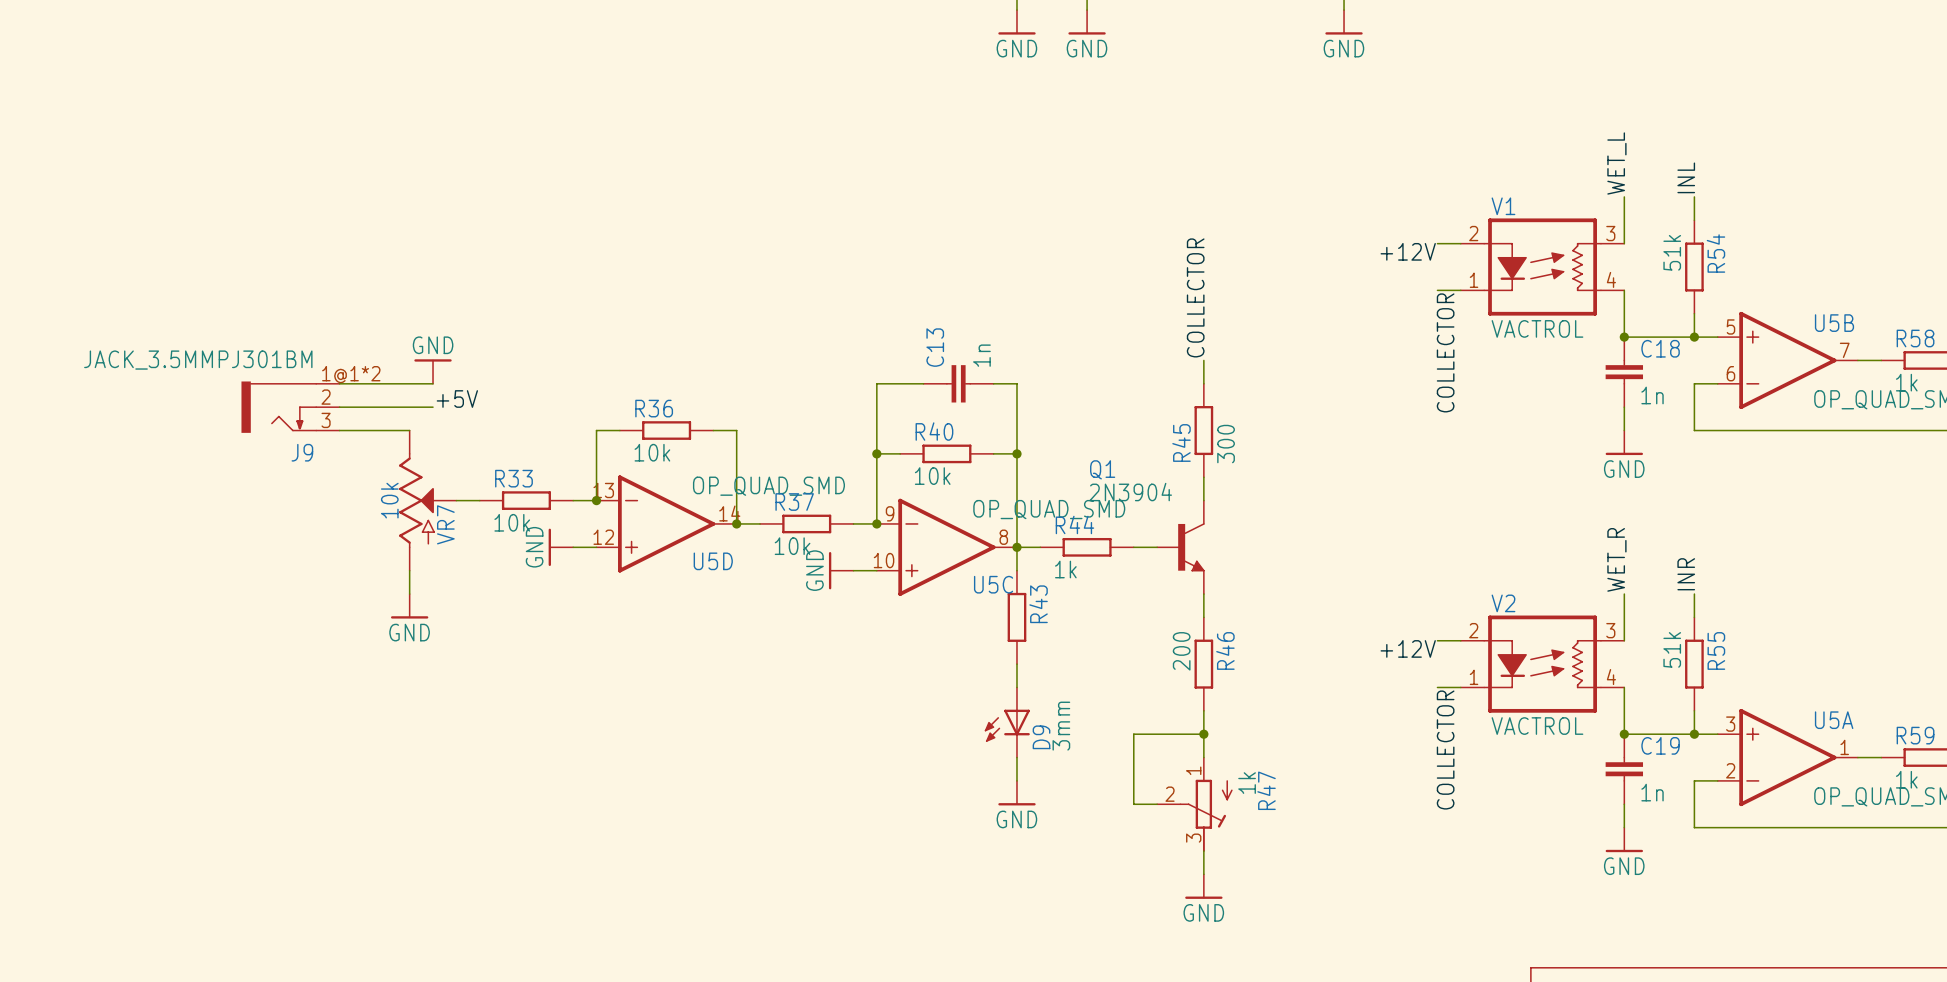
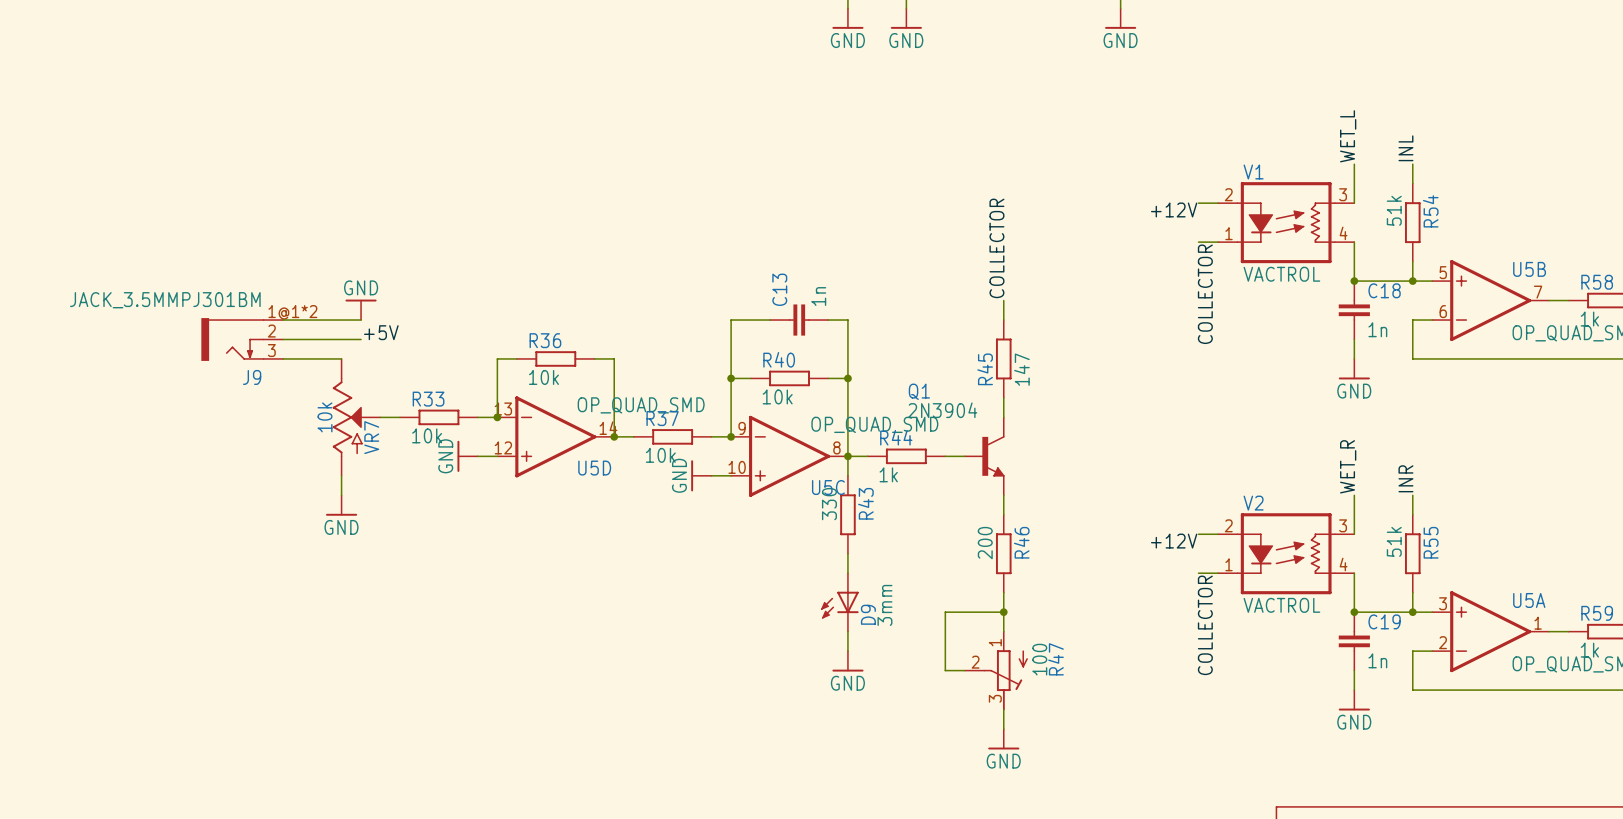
R45 value: 300 (1226, 444) -> 147 (1021, 369)
R43 value: none -> 330 (829, 504)
R47 value: 1k (1247, 783) -> 100 (1039, 659)

